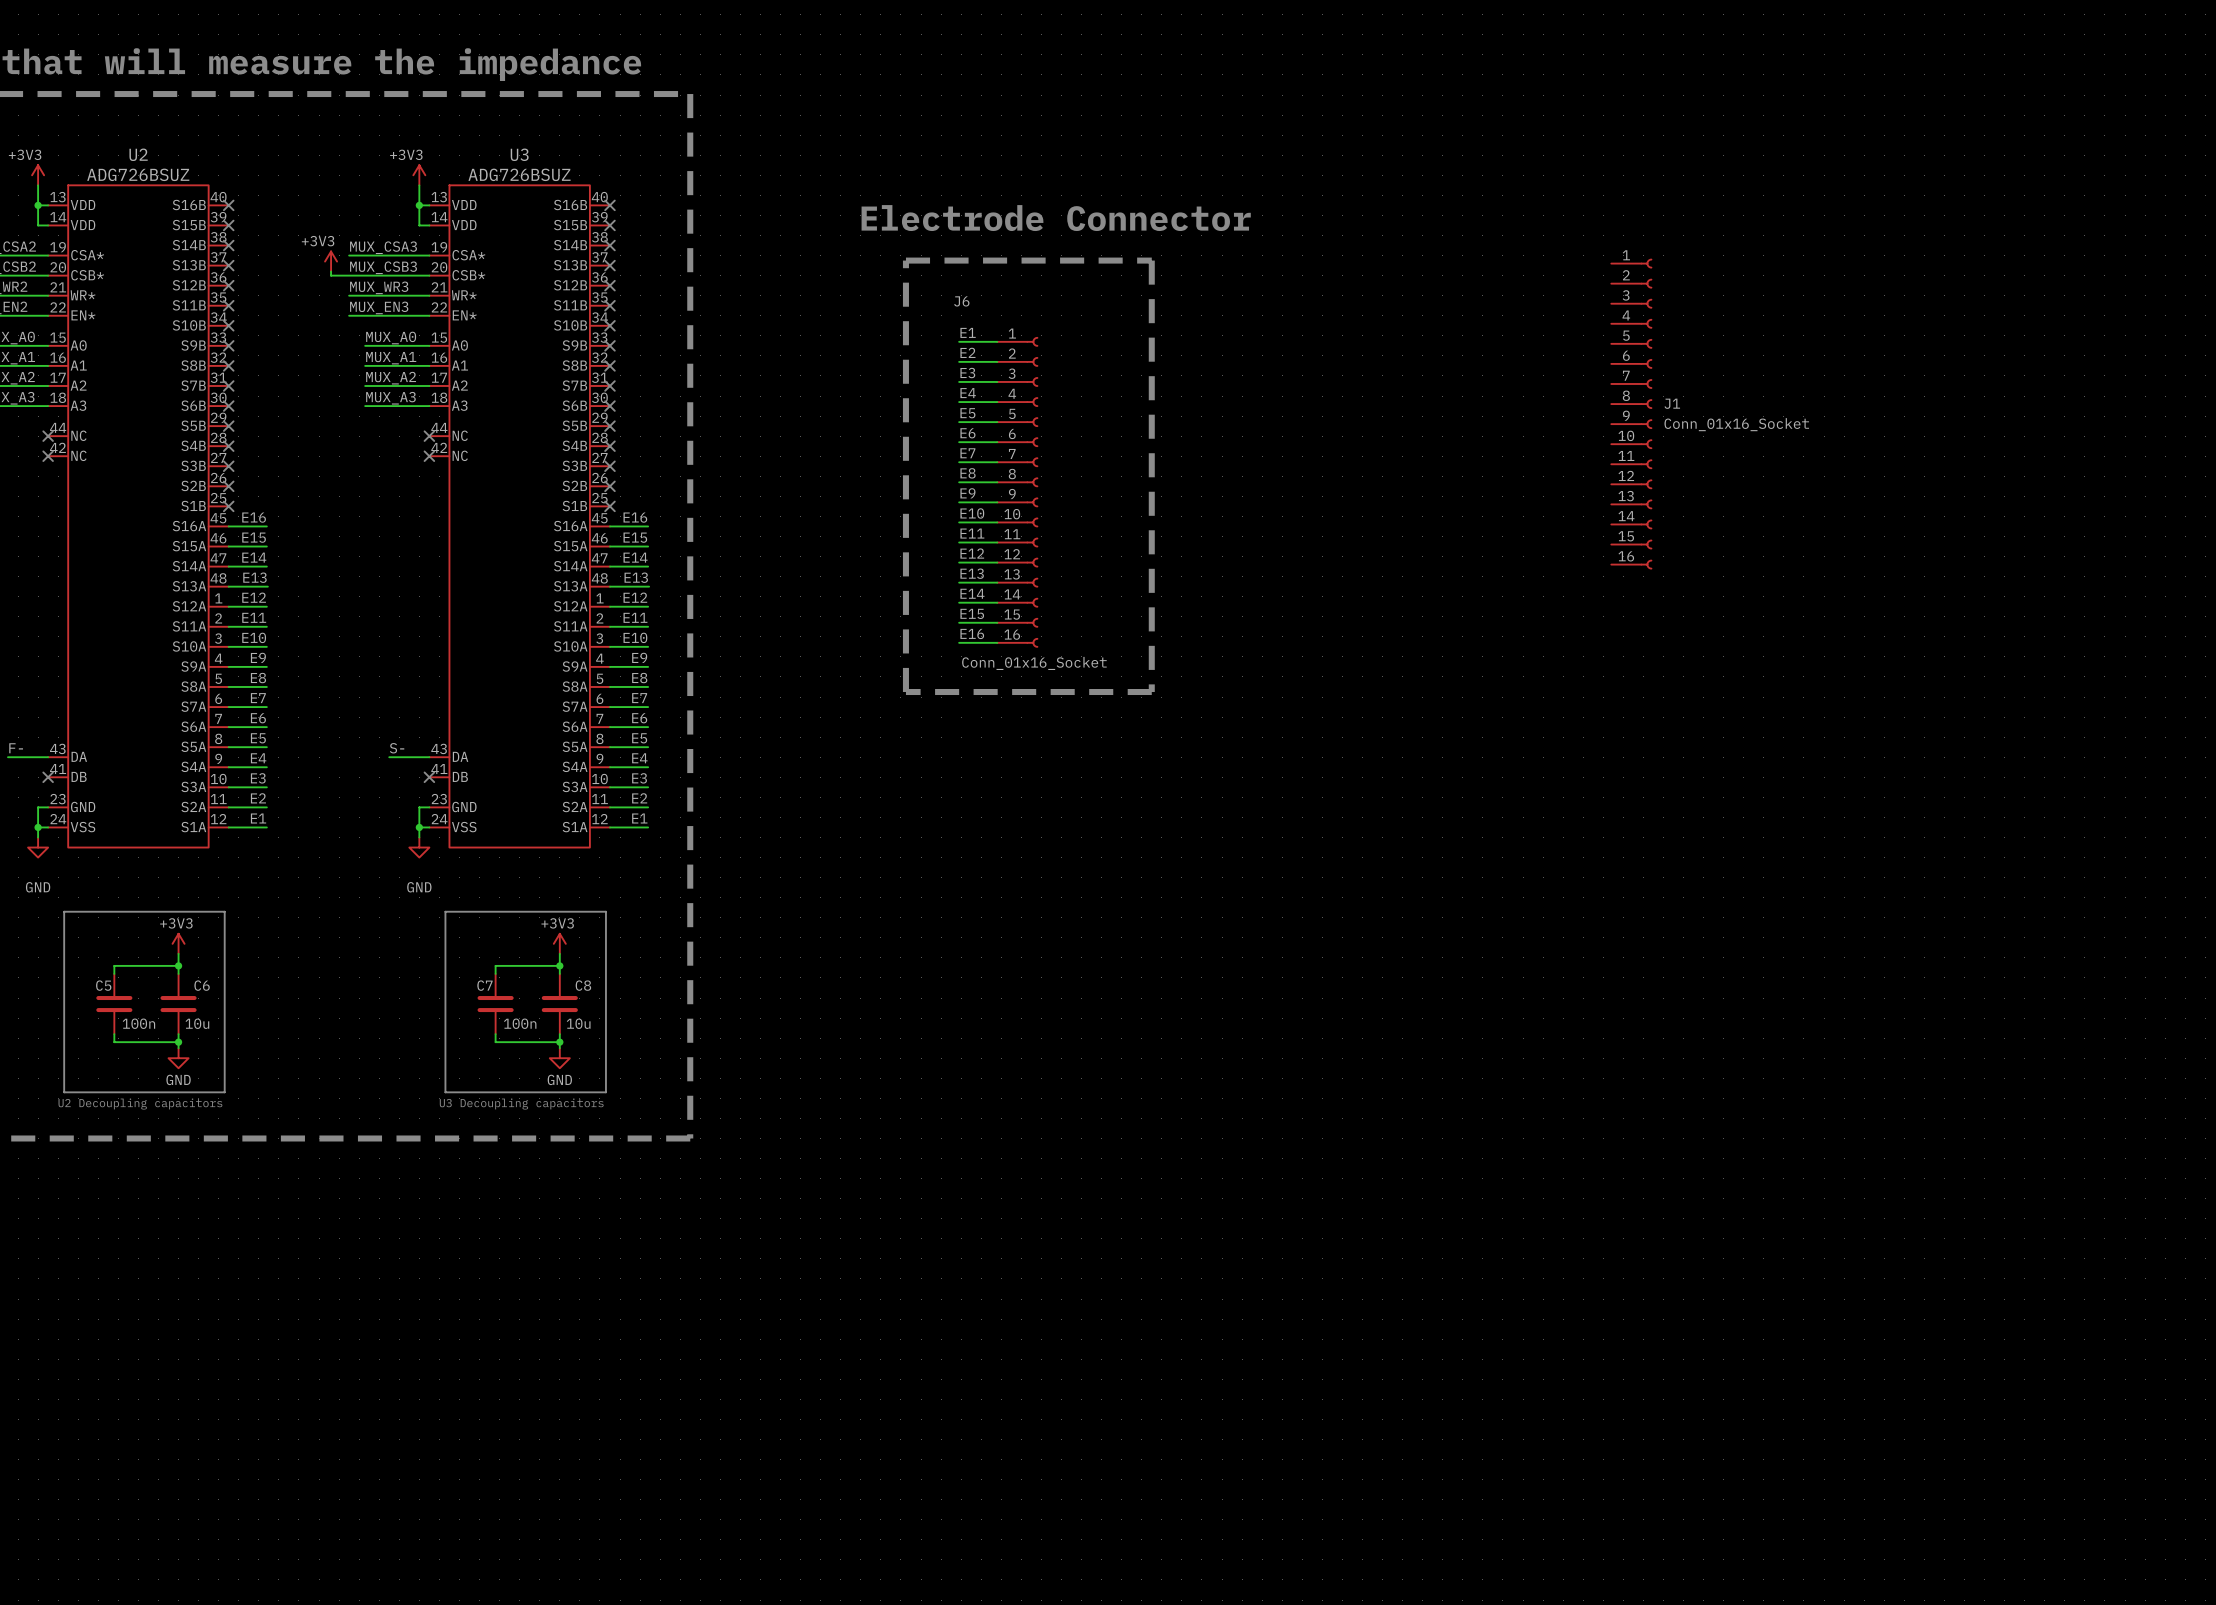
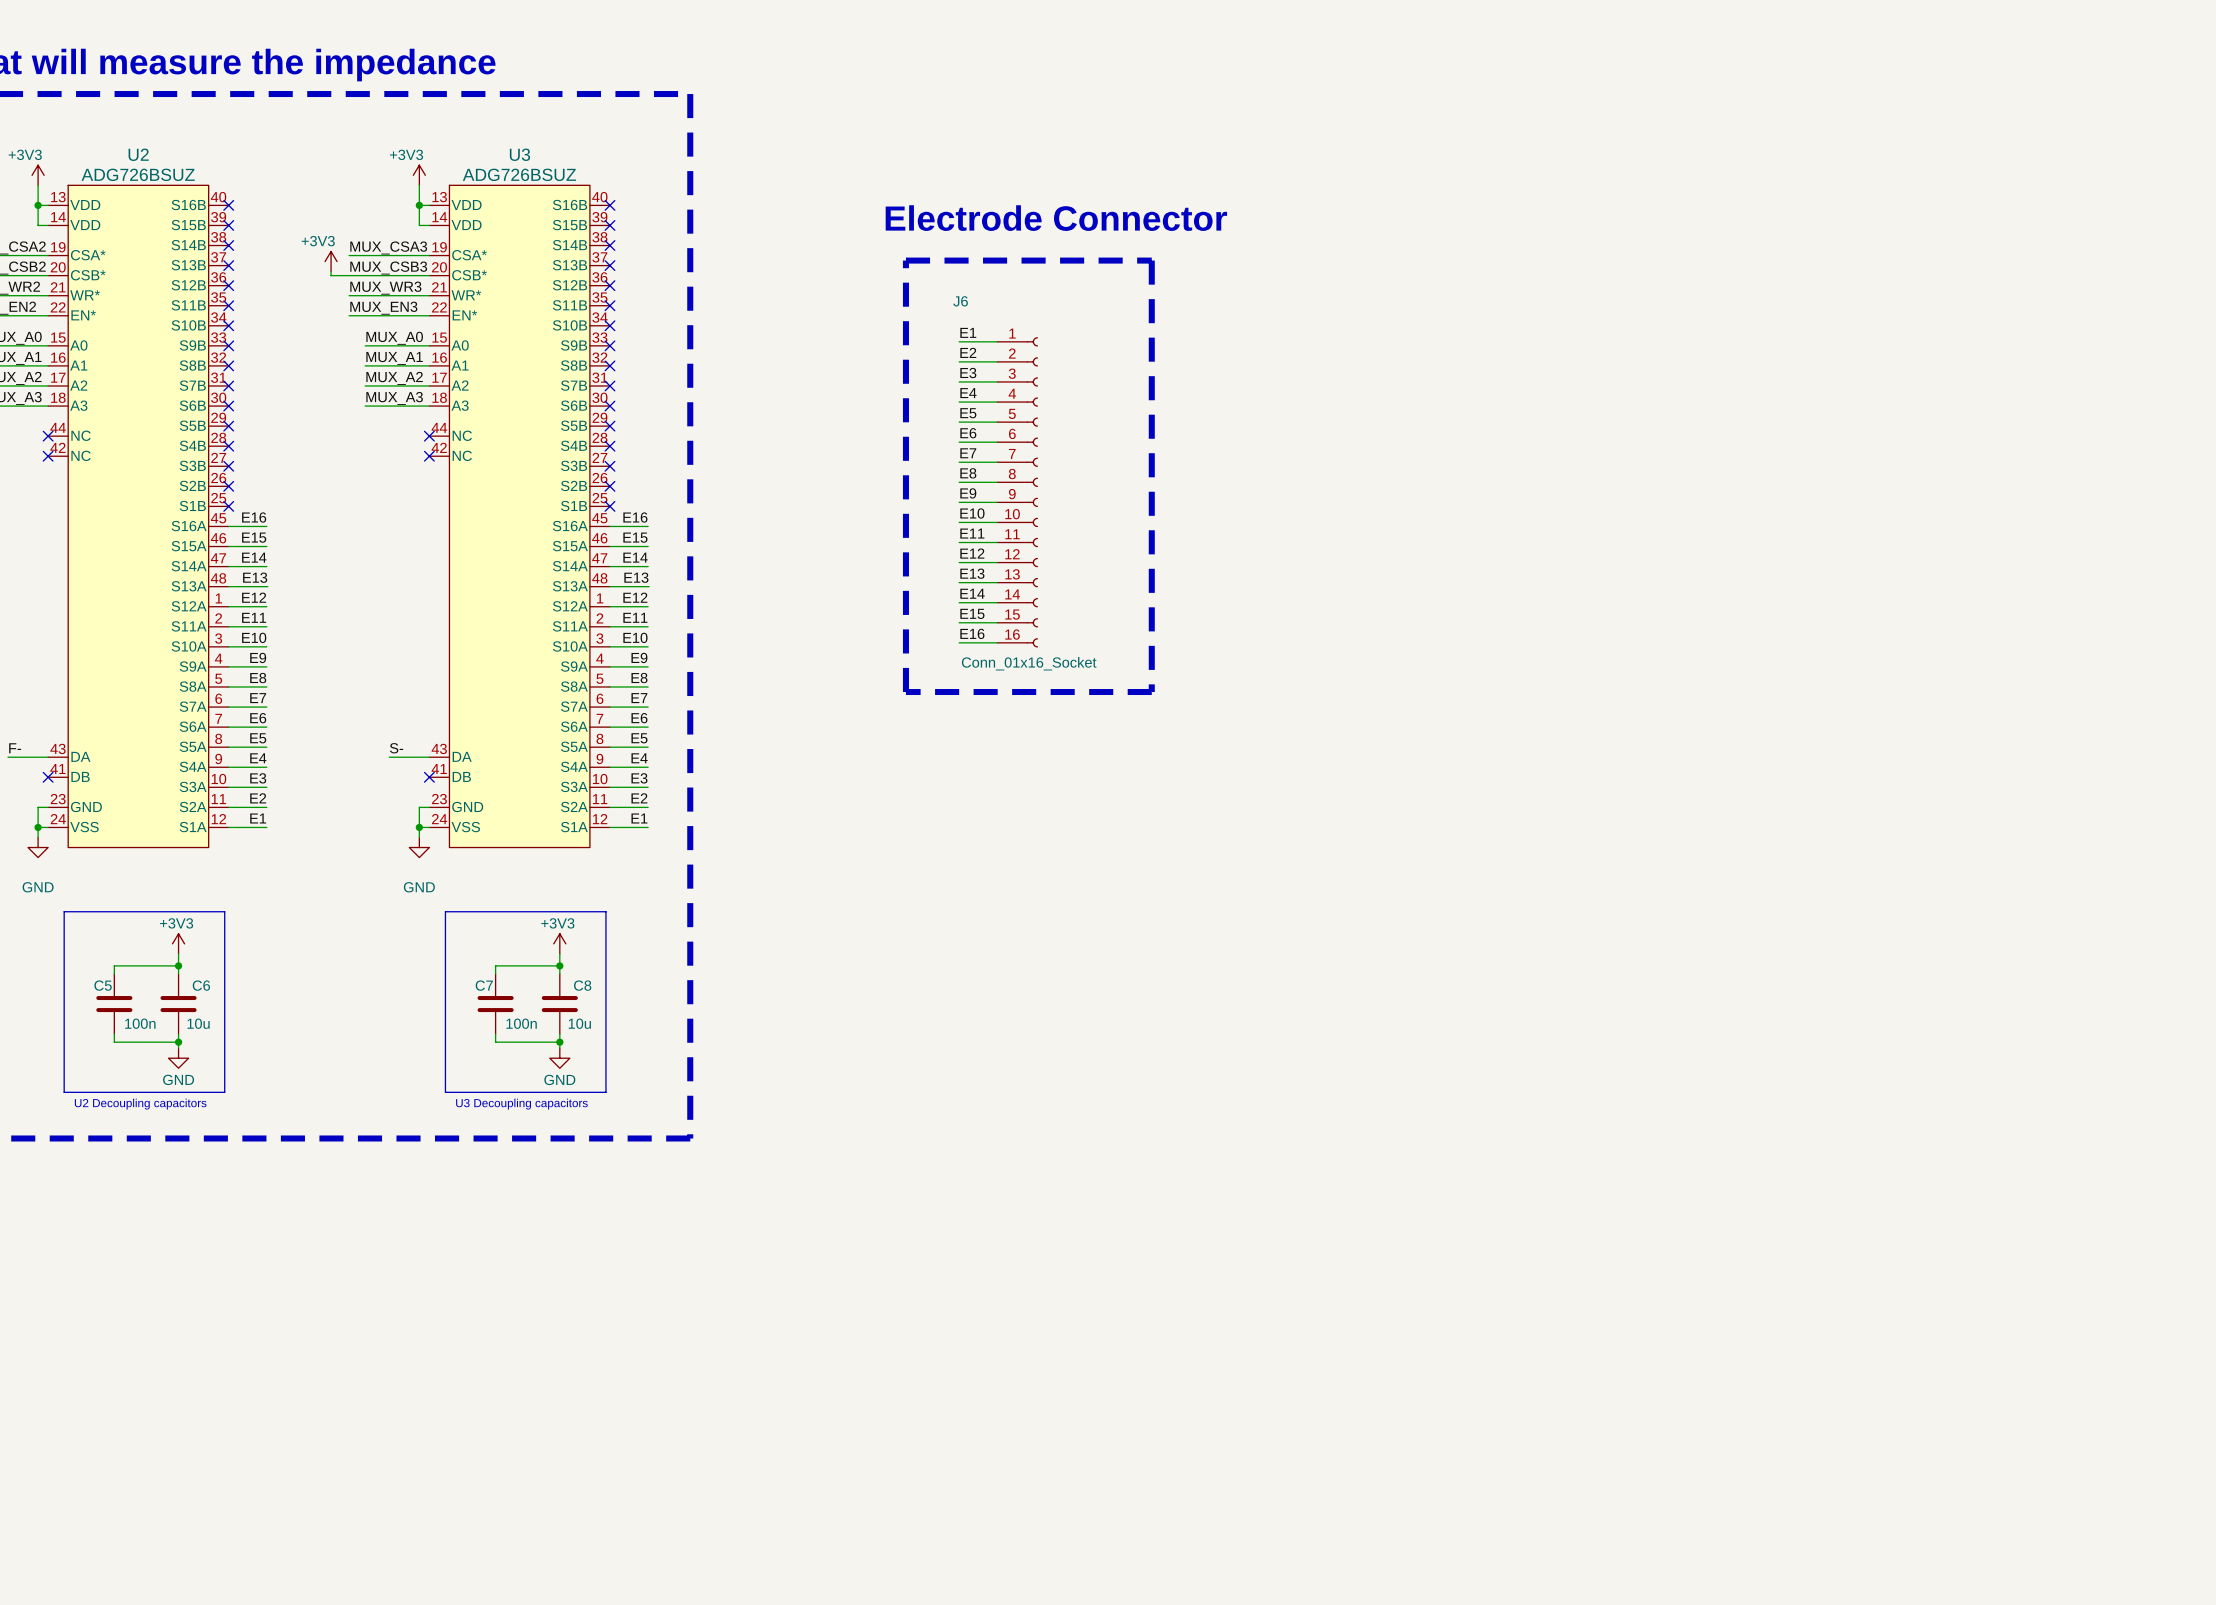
J1: Conn_01x16_Socket (1631, 414) -> none

